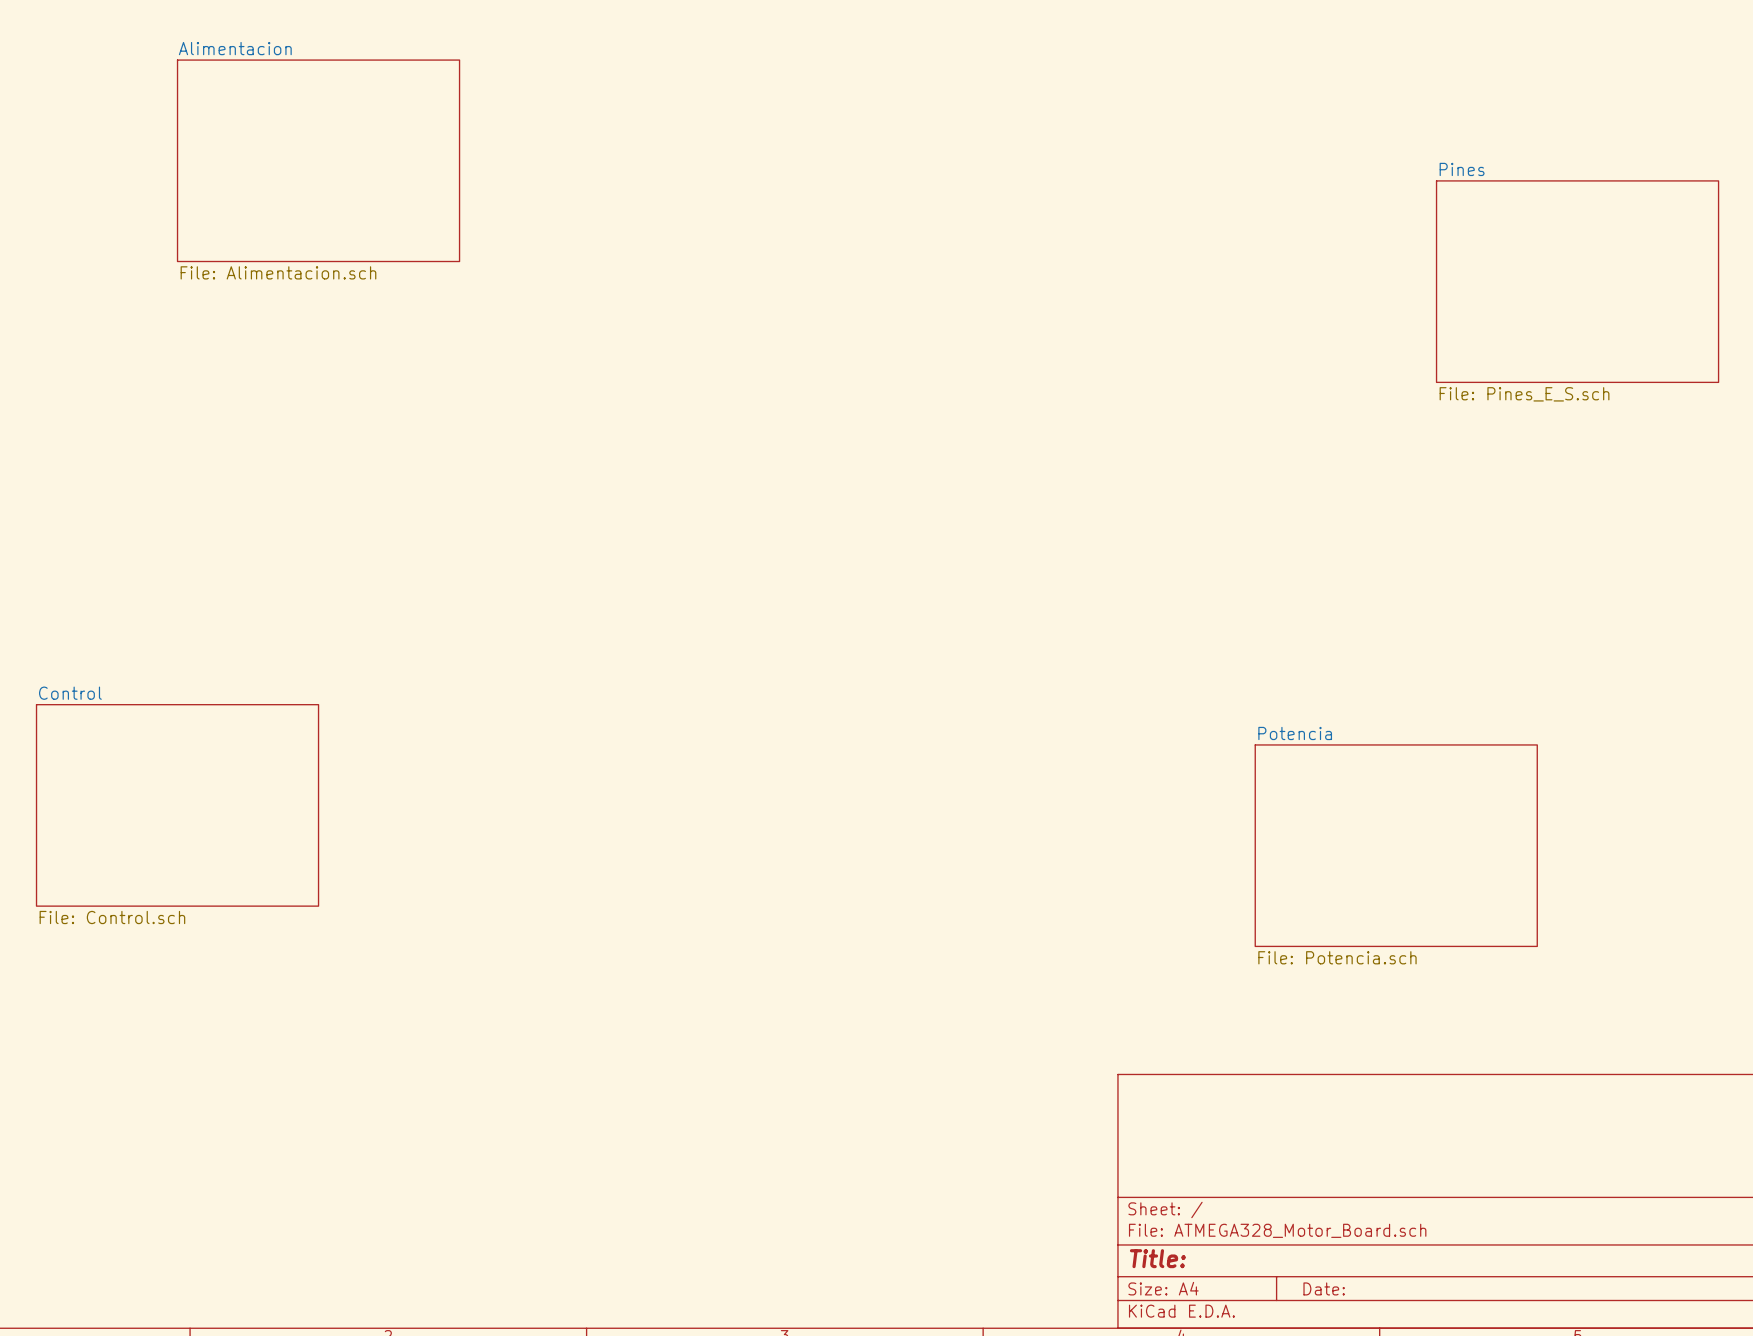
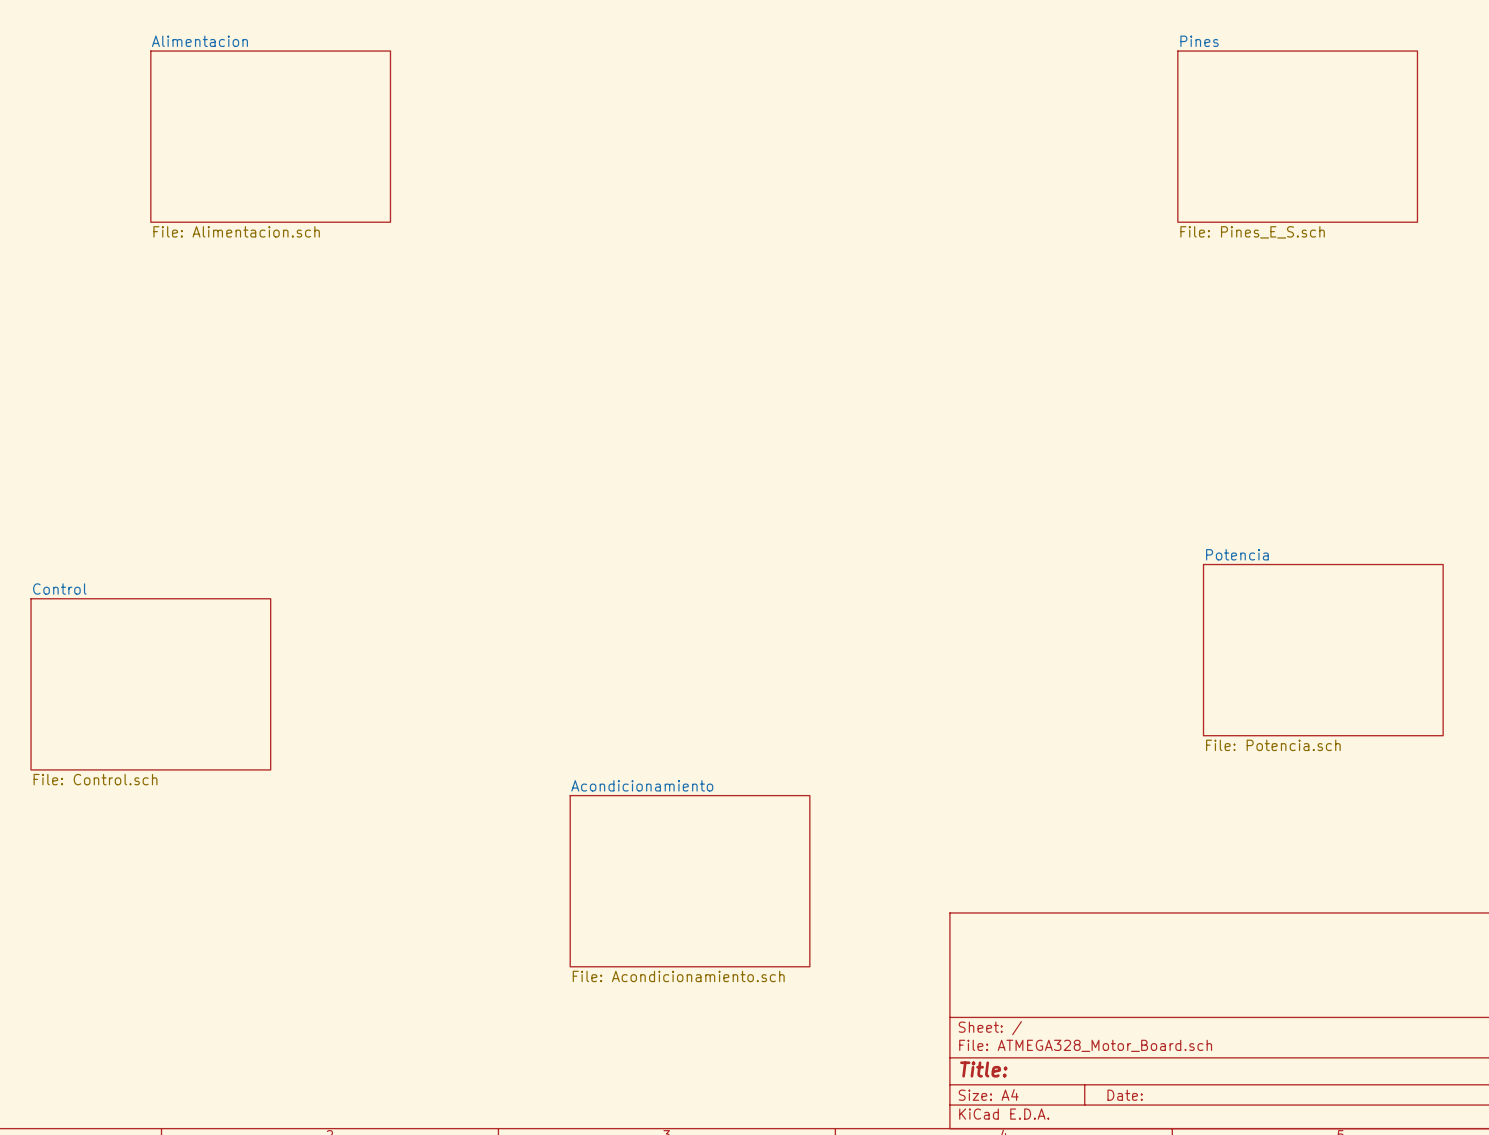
sheet Pines position: (1577, 281) -> (1297, 136)
sheet Potencia position: (1396, 845) -> (1323, 650)
sheet Acondicionamiento: none -> File: Acondicionamiento.sch (690, 881)

